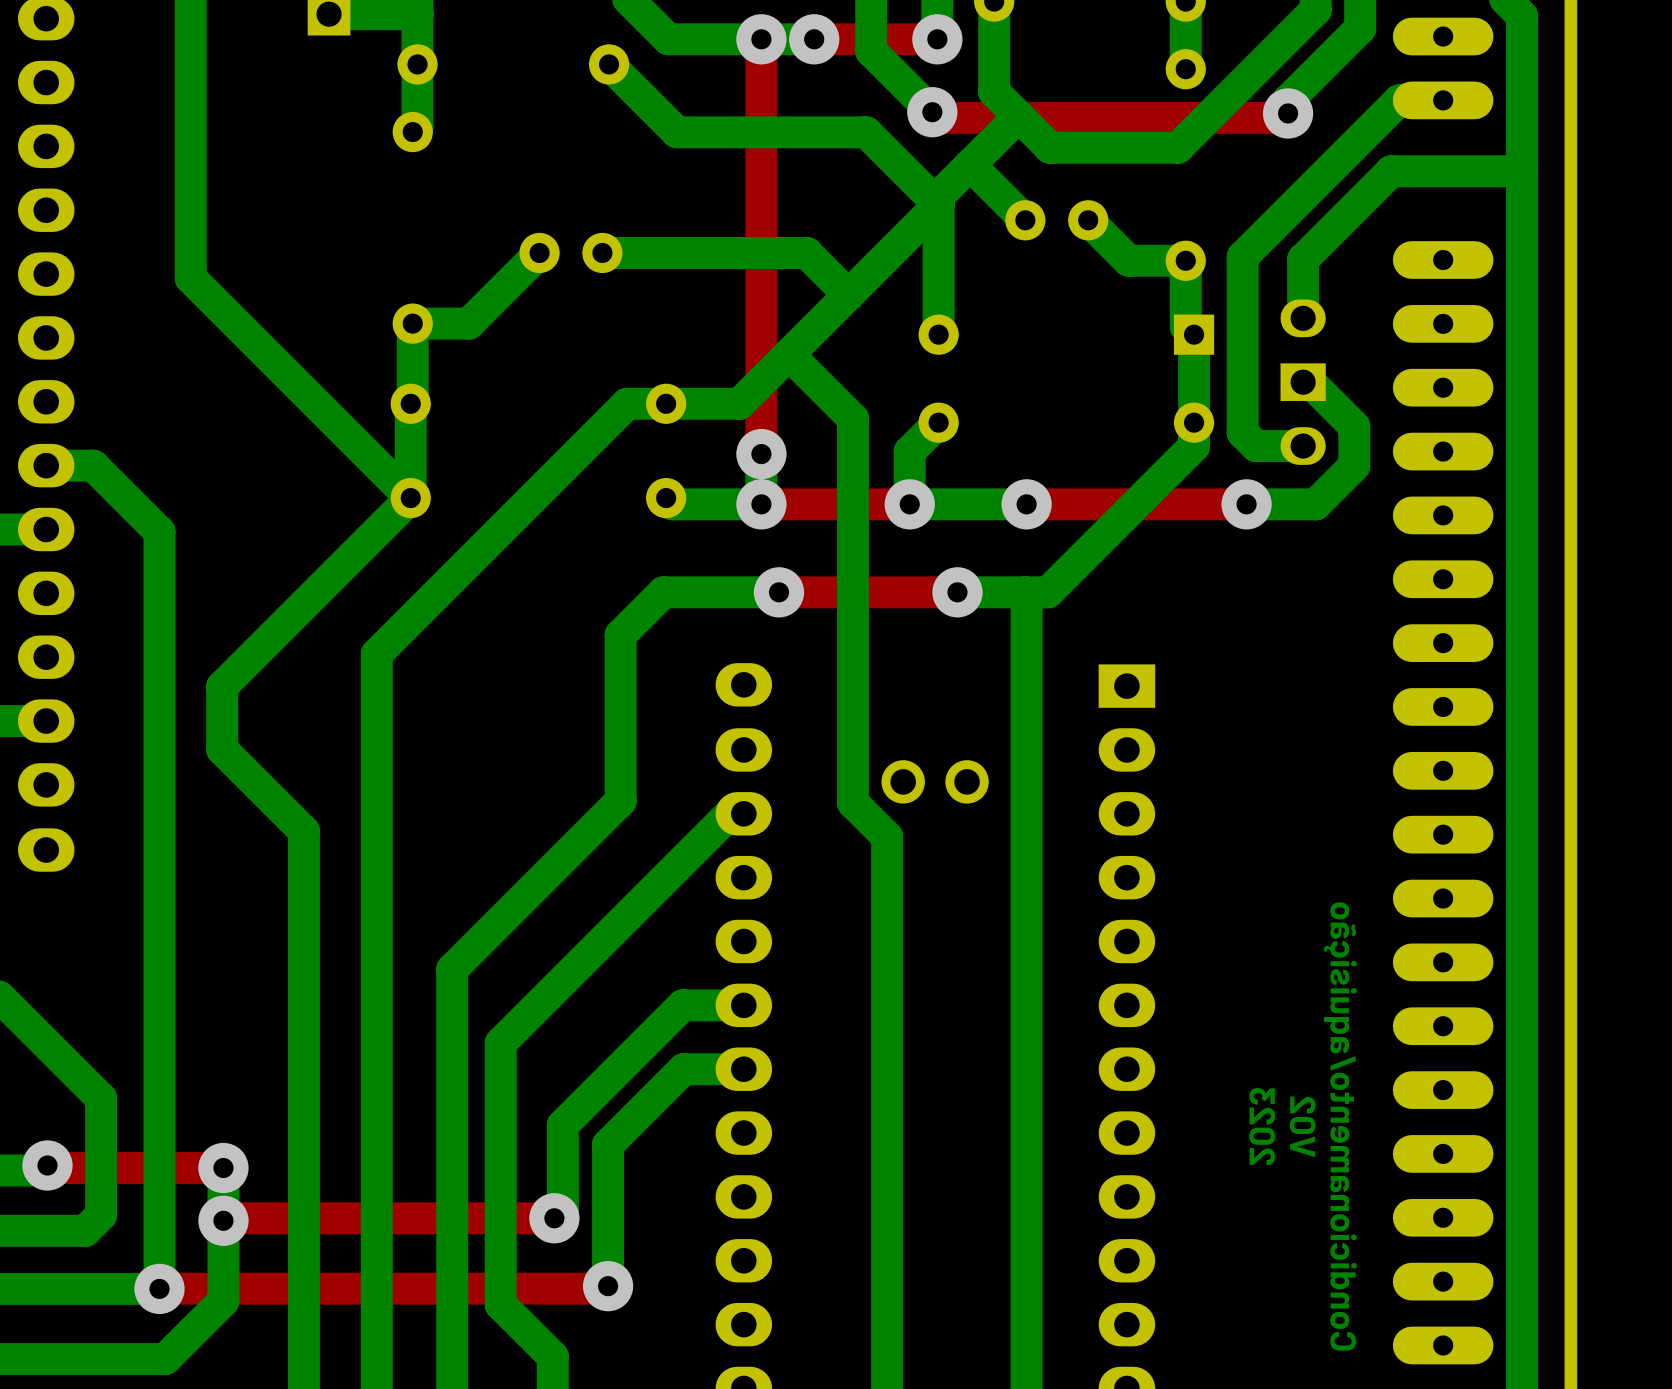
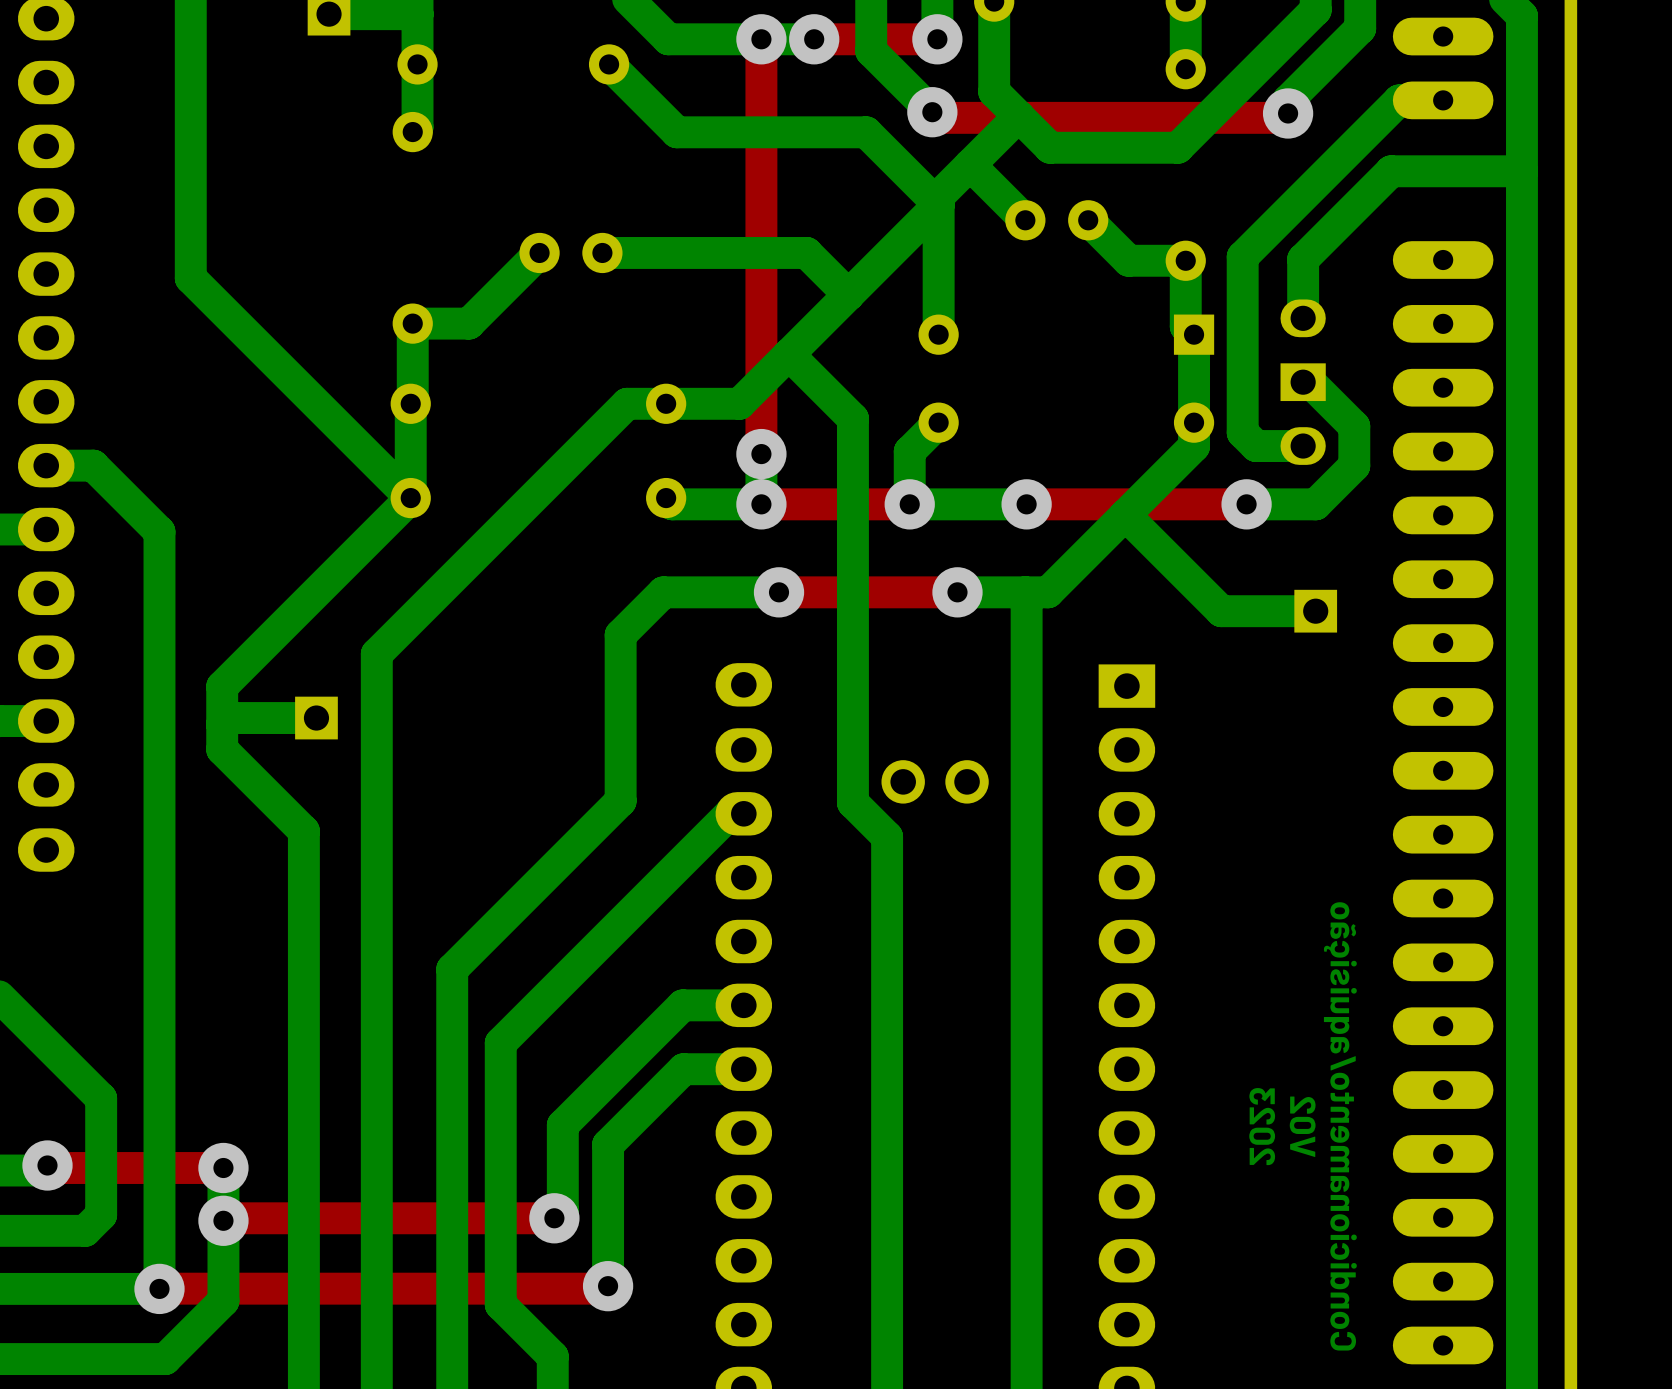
bottom track: none -> (1125, 515) (1221, 611) (1315, 611)
part: none -> (1315, 611)
bottom track: none -> (316, 718) (228, 718) (222, 724)
part: none -> (316, 718)

